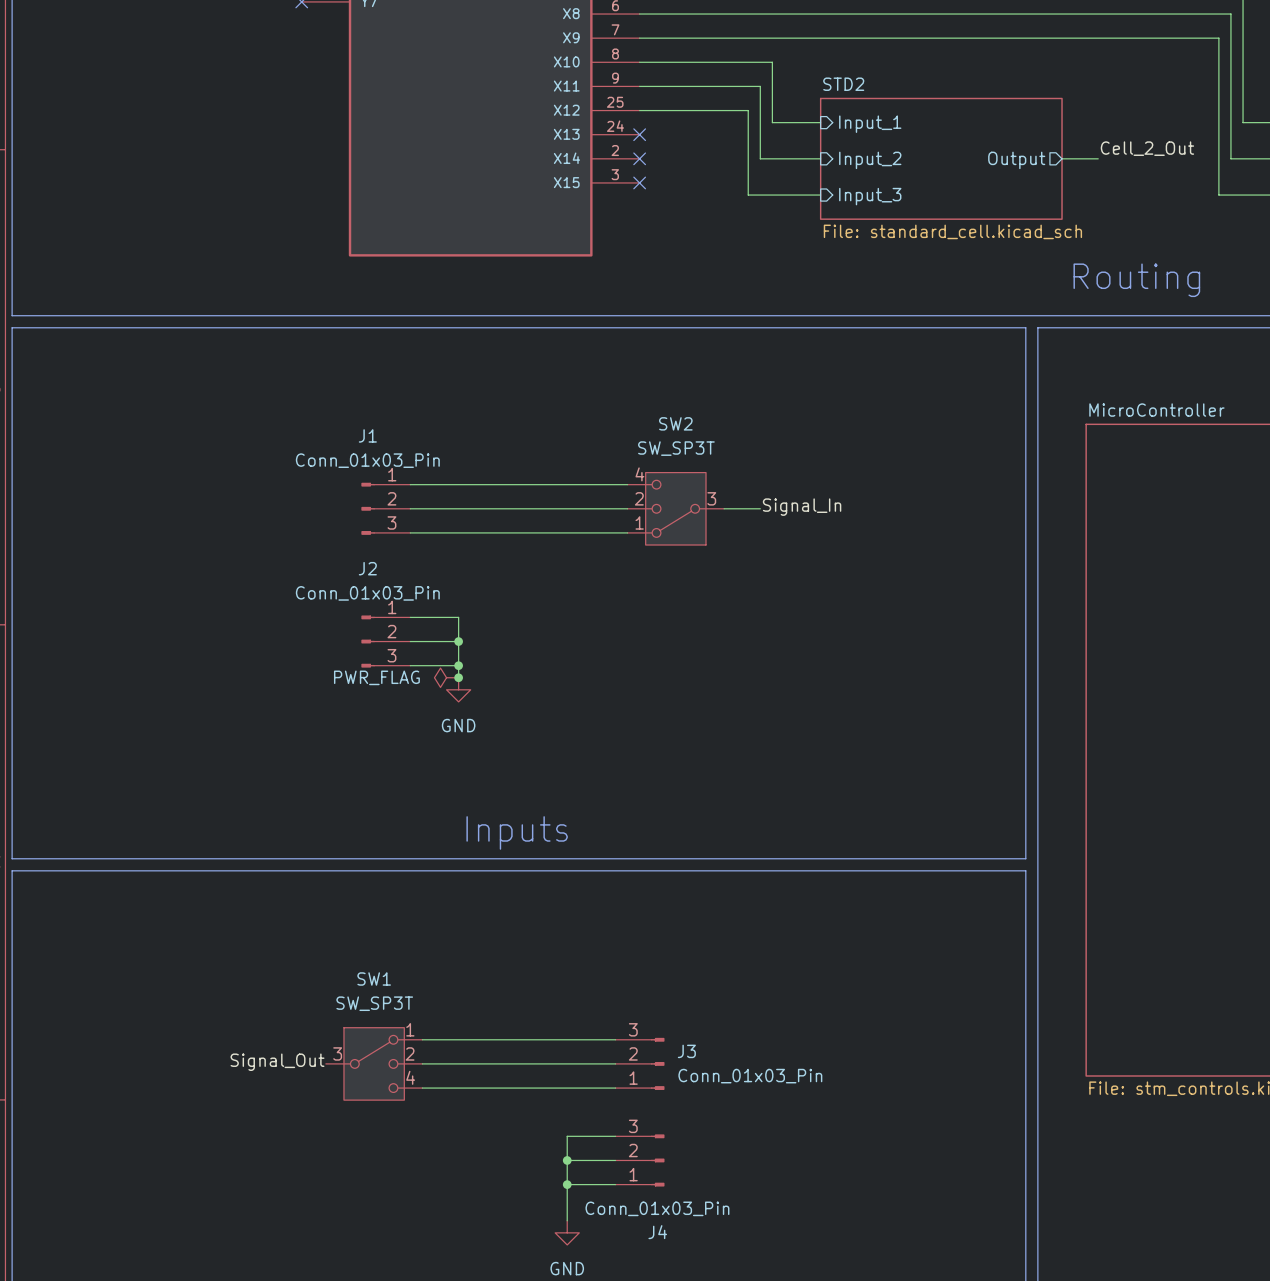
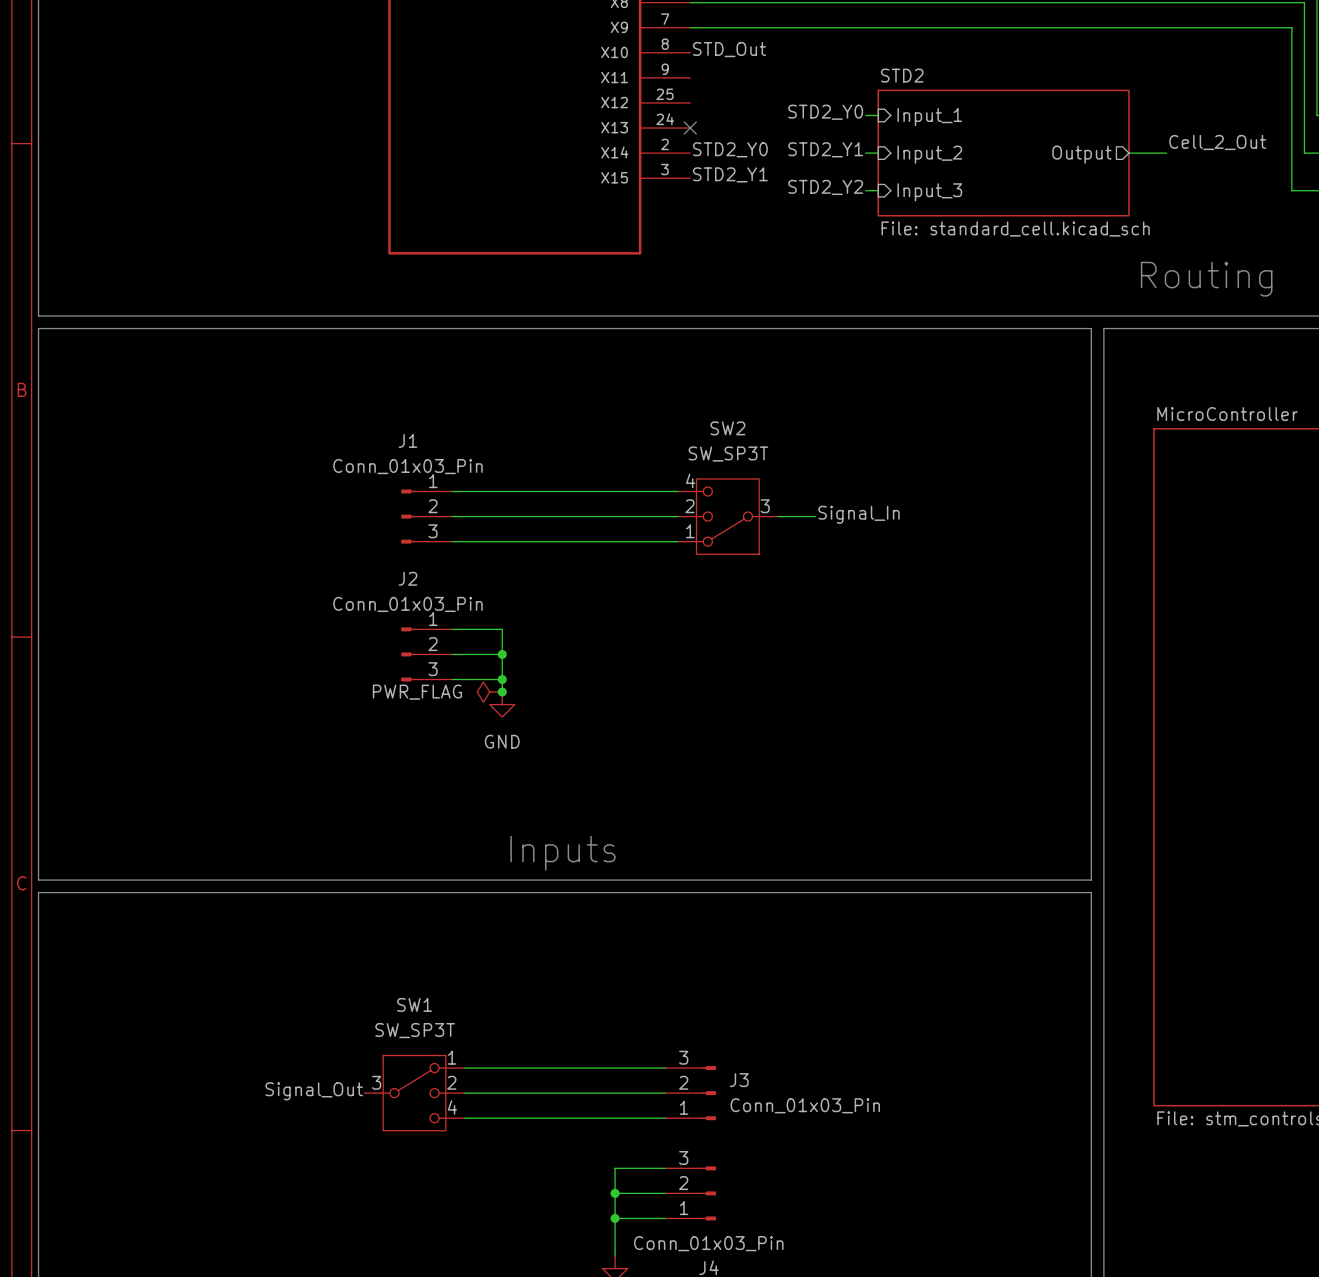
label: none -> STD_Out (729, 49)
wire: (639, 62) (772, 62) (772, 122) (808, 122) -> none
wire: (639, 86) (760, 86) (760, 158) (808, 158) -> none
wire: (639, 110) (748, 110) (748, 195) (808, 195) -> none
label: none -> STD2_Y0 (825, 112)
label: none -> STD2_Y0 (730, 149)
label: none -> STD2_Y1 (825, 149)
no-connect mark: (639, 158) -> none
label: none -> STD2_Y1 (730, 174)
no-connect mark: (639, 182) -> none
label: none -> STD2_Y2 (825, 187)

